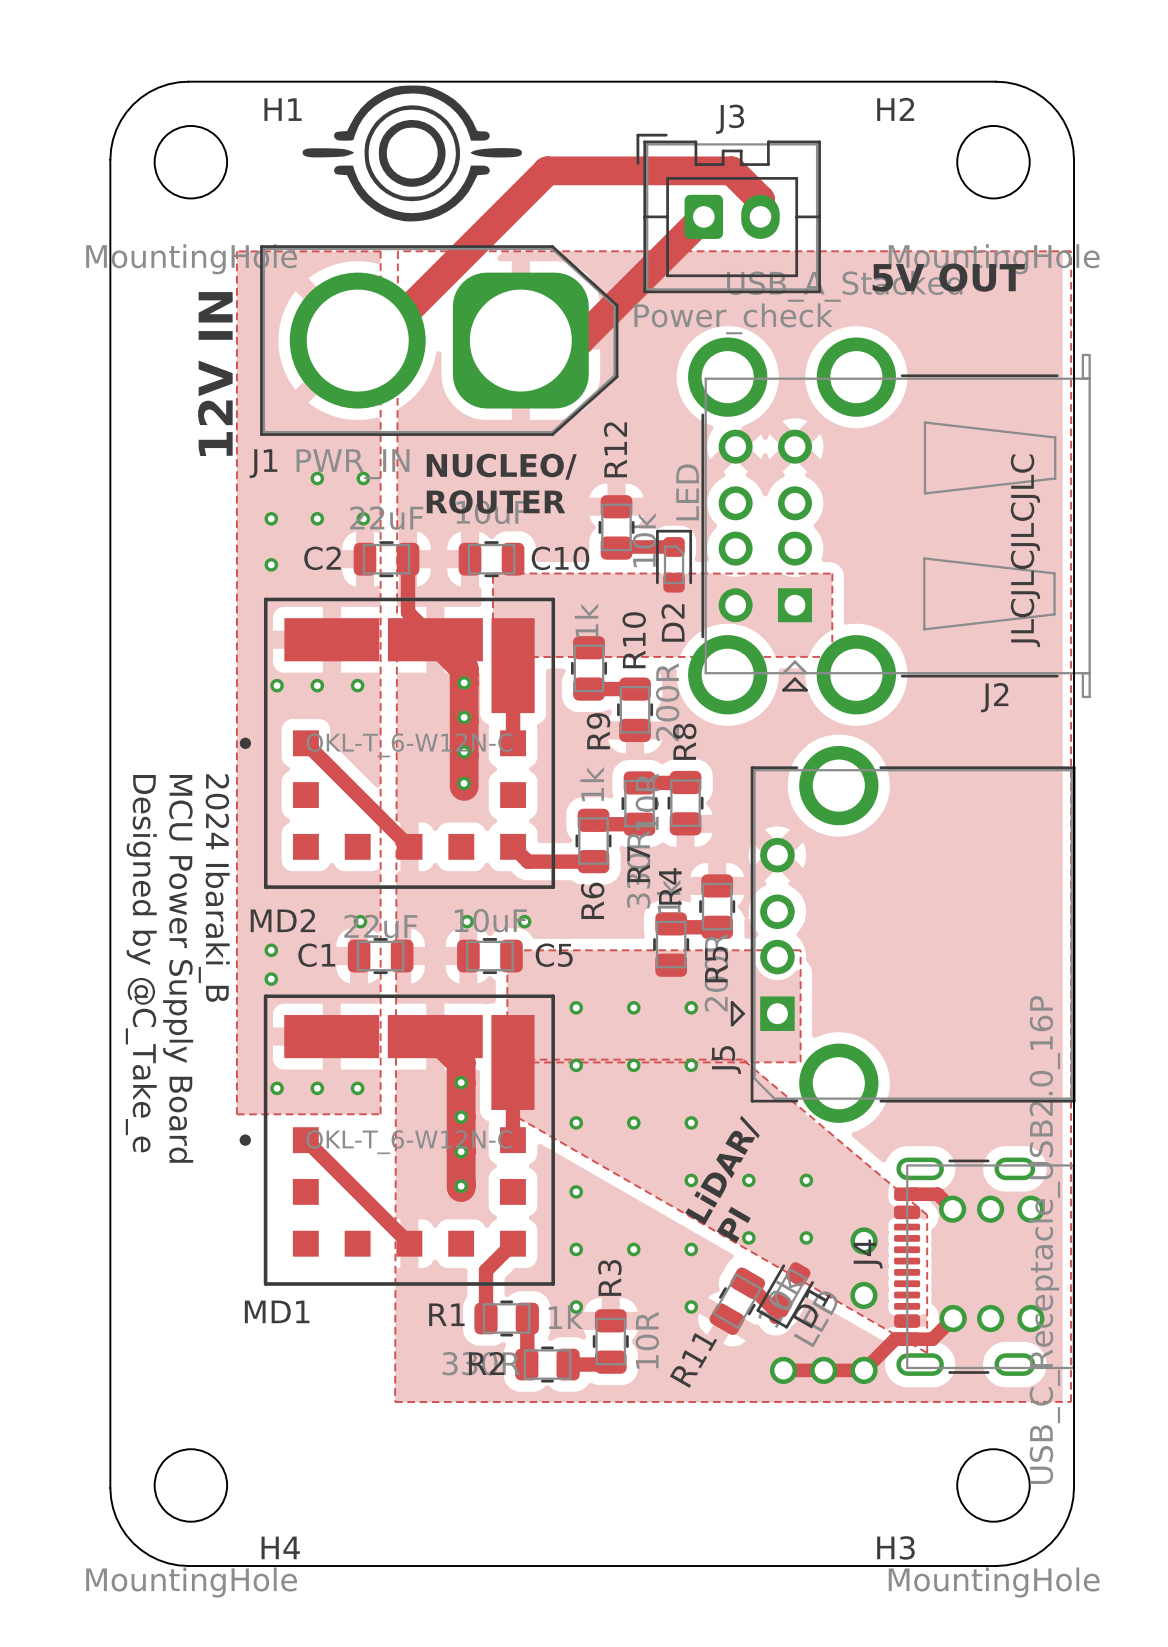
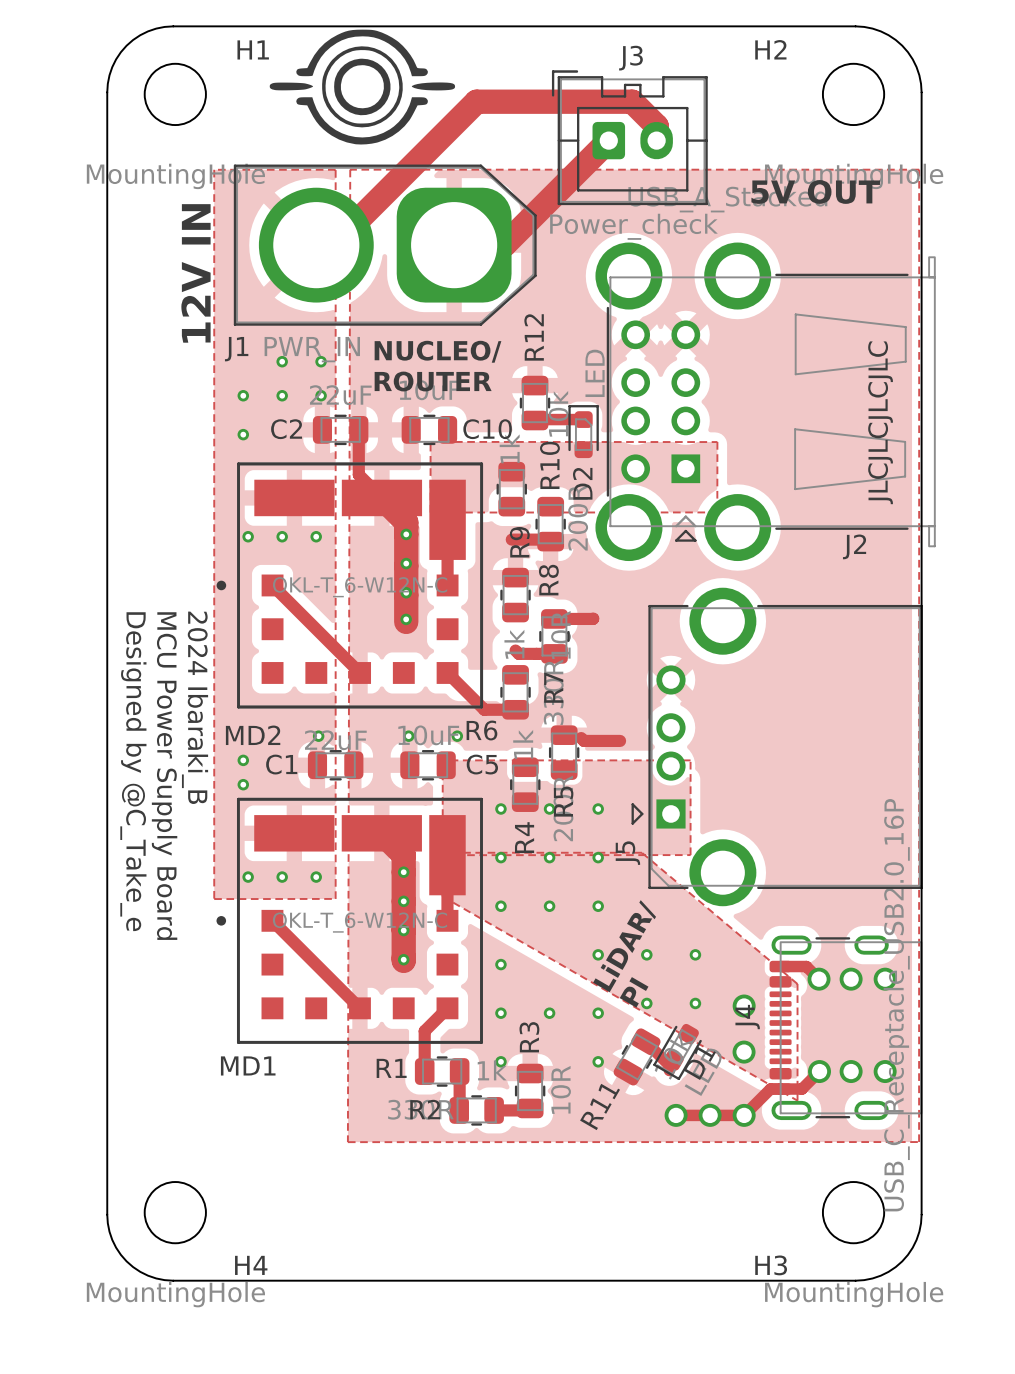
R9 position: (589, 668) -> (511, 489)
R10 position: (635, 709) -> (550, 524)
R8 name position: R8 (684, 741) -> R8 (548, 580)
R8 position: (685, 803) -> (515, 595)
R6 position: (593, 840) -> (515, 692)
track: (527, 861) (593, 861) -> (460, 685) (484, 709) (515, 709)
R4 name position: R4 (670, 886) -> R4 (524, 837)
R6 name rotation: 0° (592, 900) -> 90° clockwise (481, 730)
R5 position: (717, 906) -> (564, 752)
R4 position: (671, 944) -> (525, 784)

